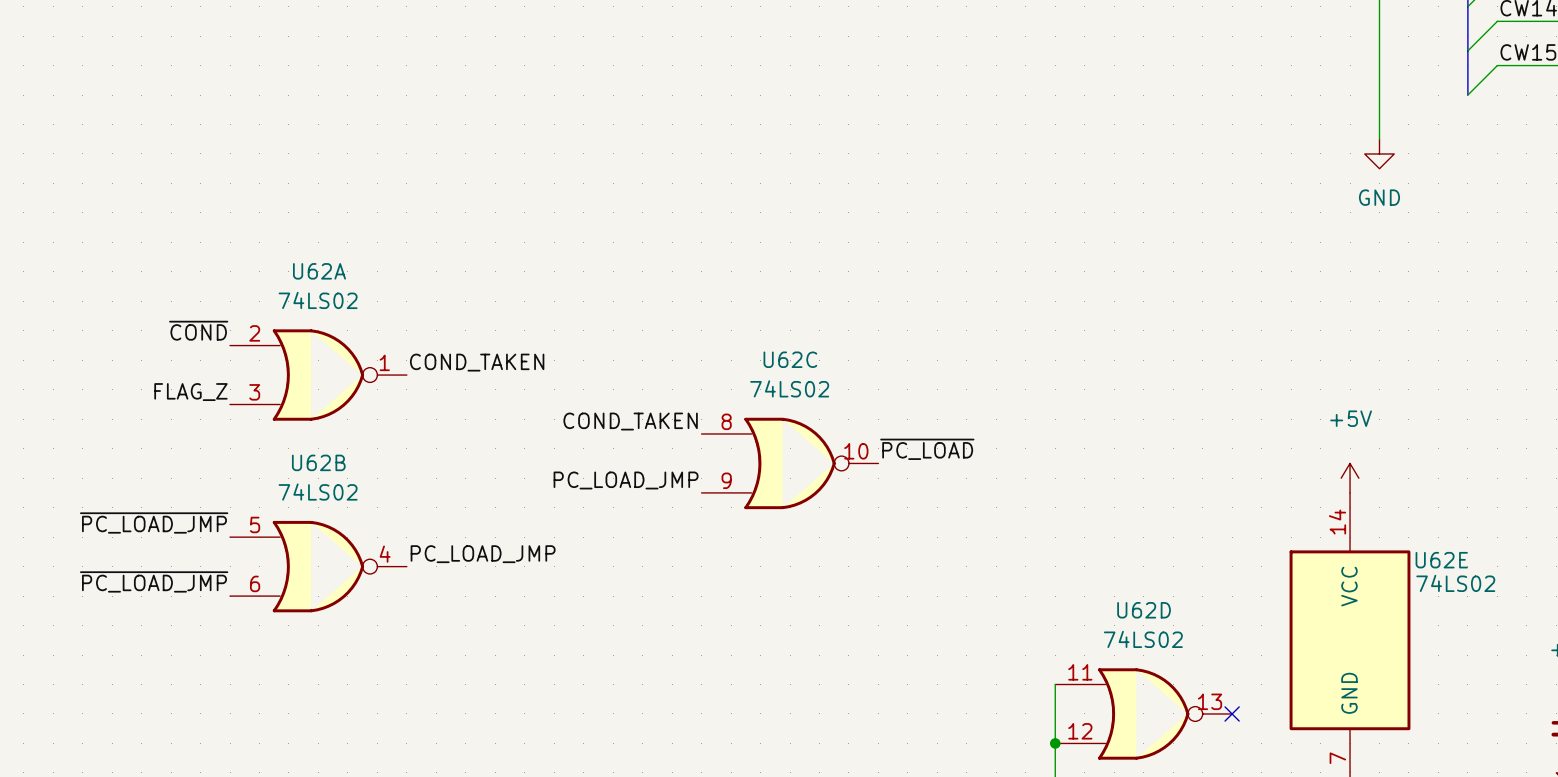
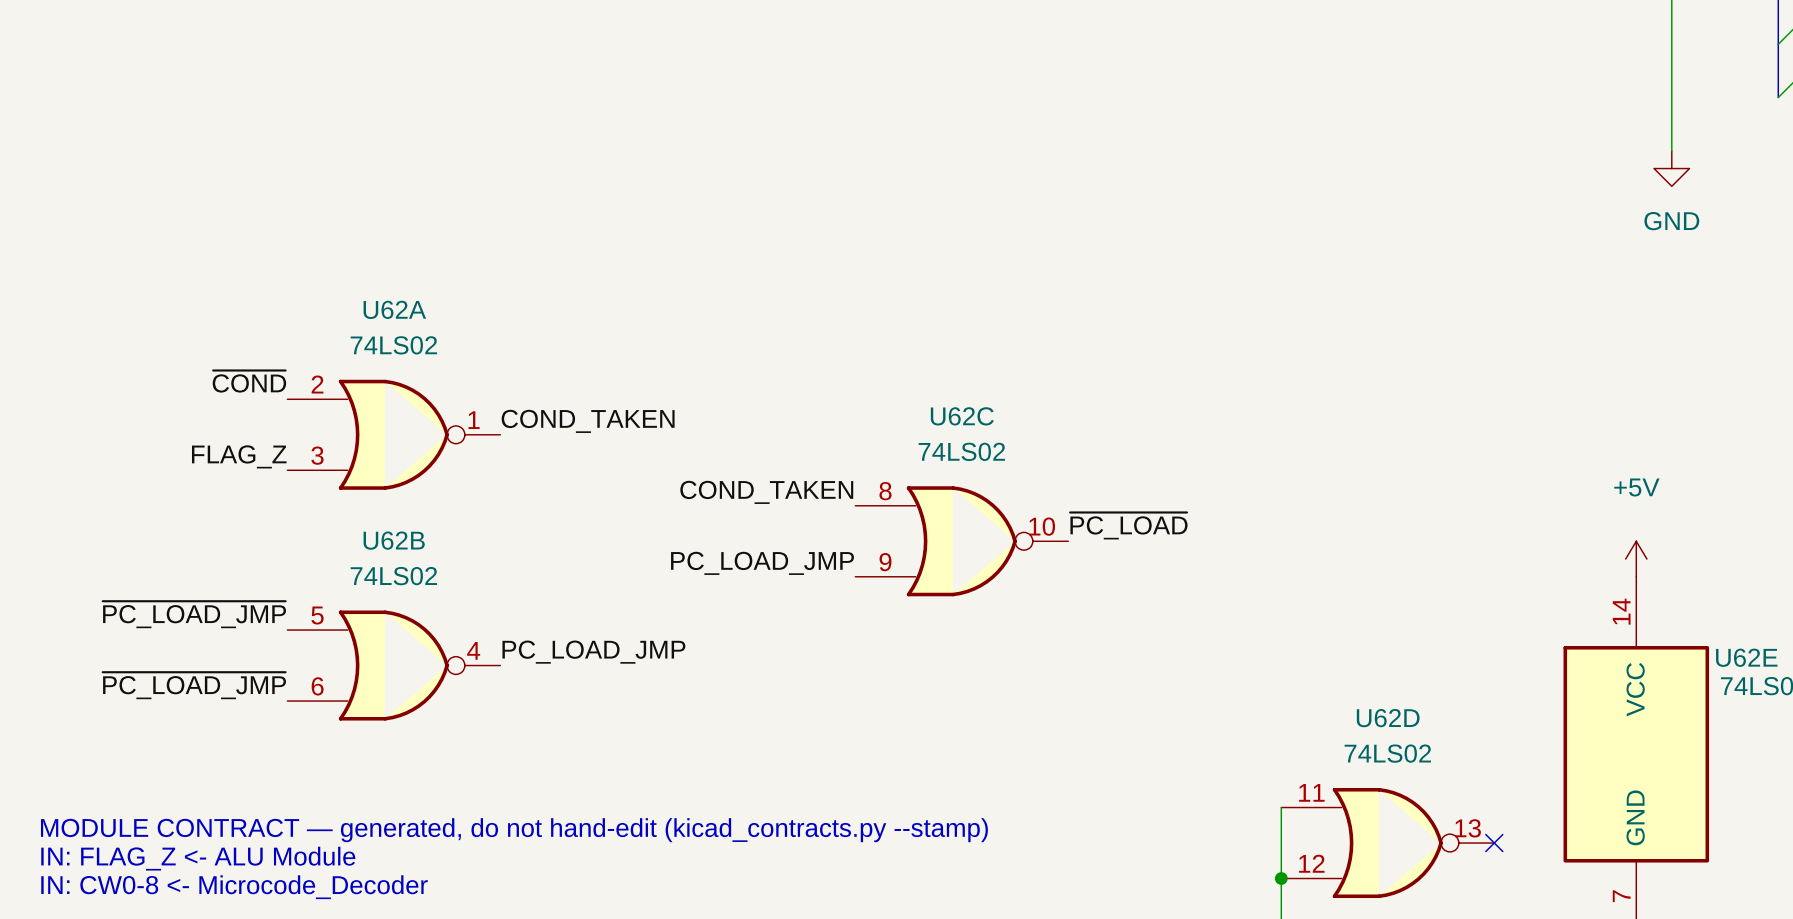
text: none -> MODULE CONTRACT — generated, do not hand-edit (kicad_contracts.py --stamp) (514, 830)
text: none -> IN: FLAG_Z <- ALU Module (198, 858)
text: none -> IN: CW0-8 <- Microcode_Decoder (234, 887)

